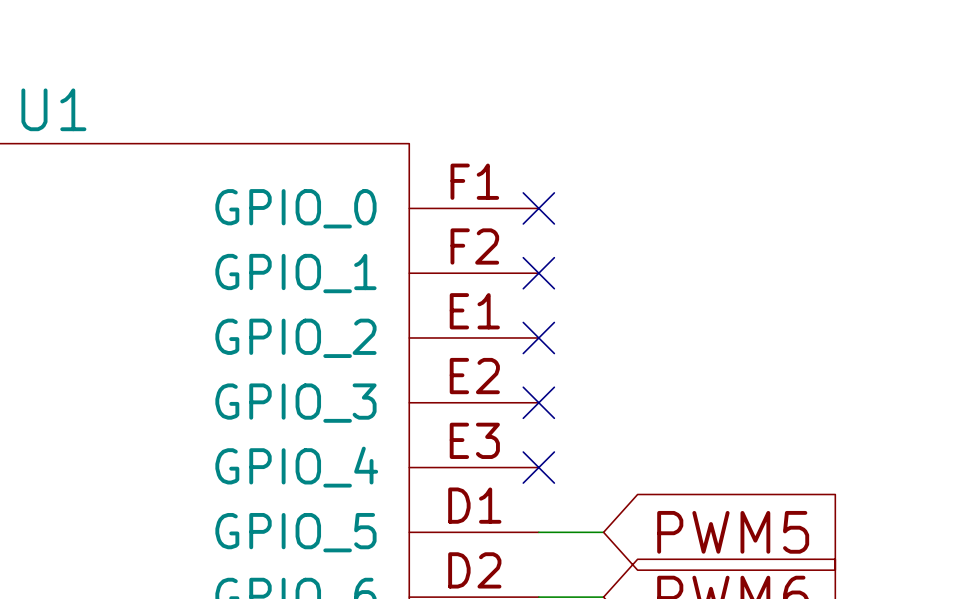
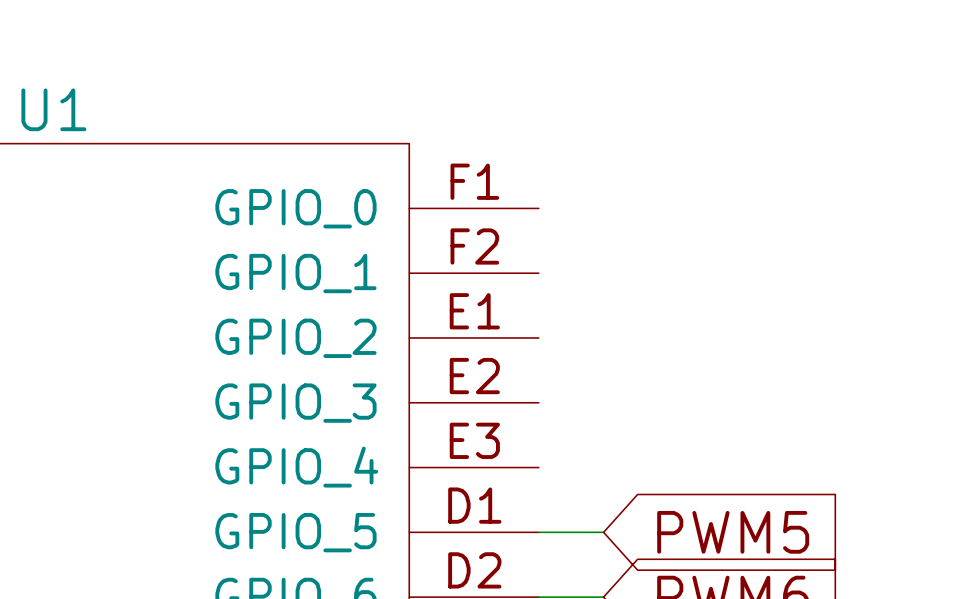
no-connect mark: (538, 208) -> none
no-connect mark: (538, 273) -> none
no-connect mark: (538, 337) -> none
no-connect mark: (538, 402) -> none
no-connect mark: (538, 467) -> none

